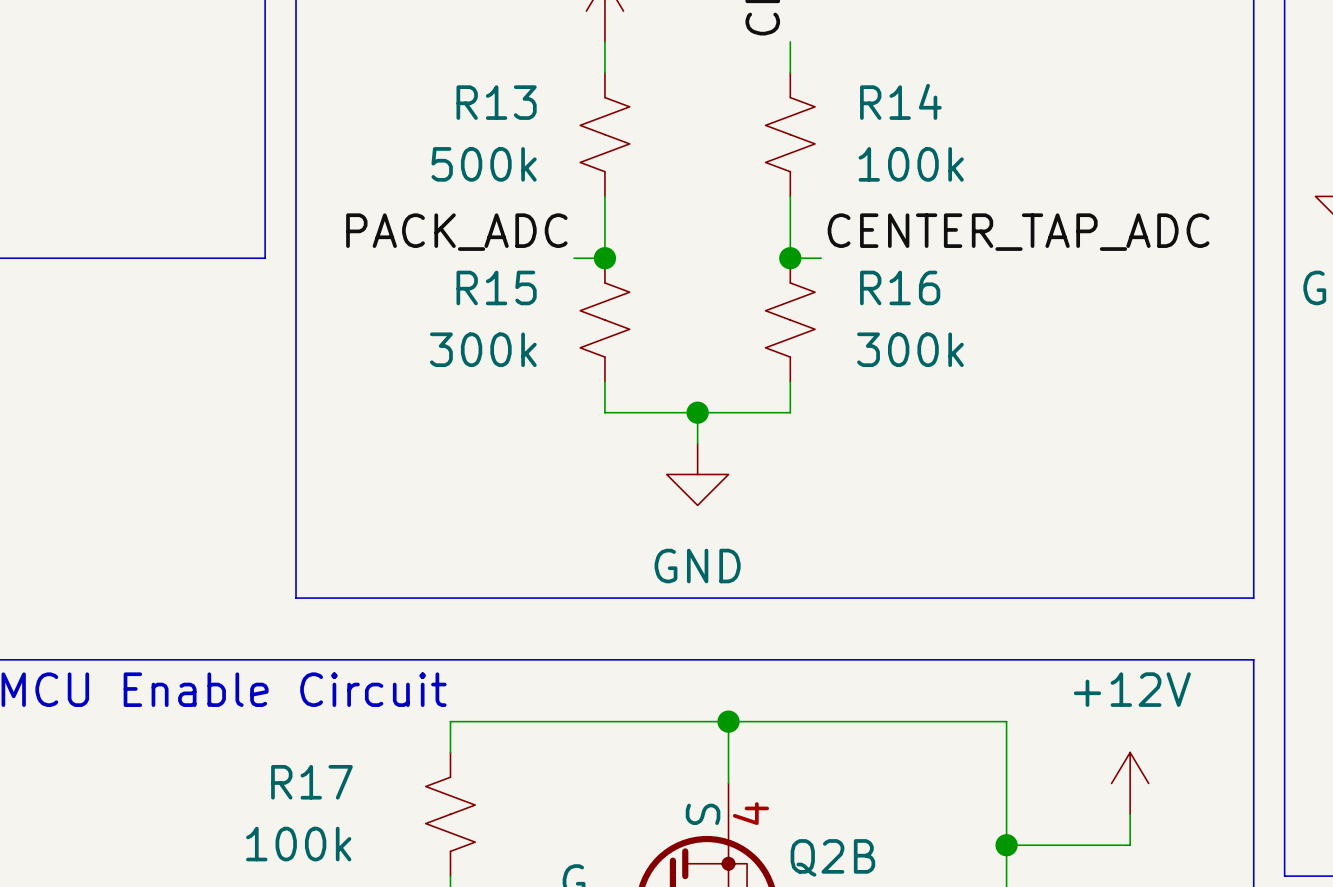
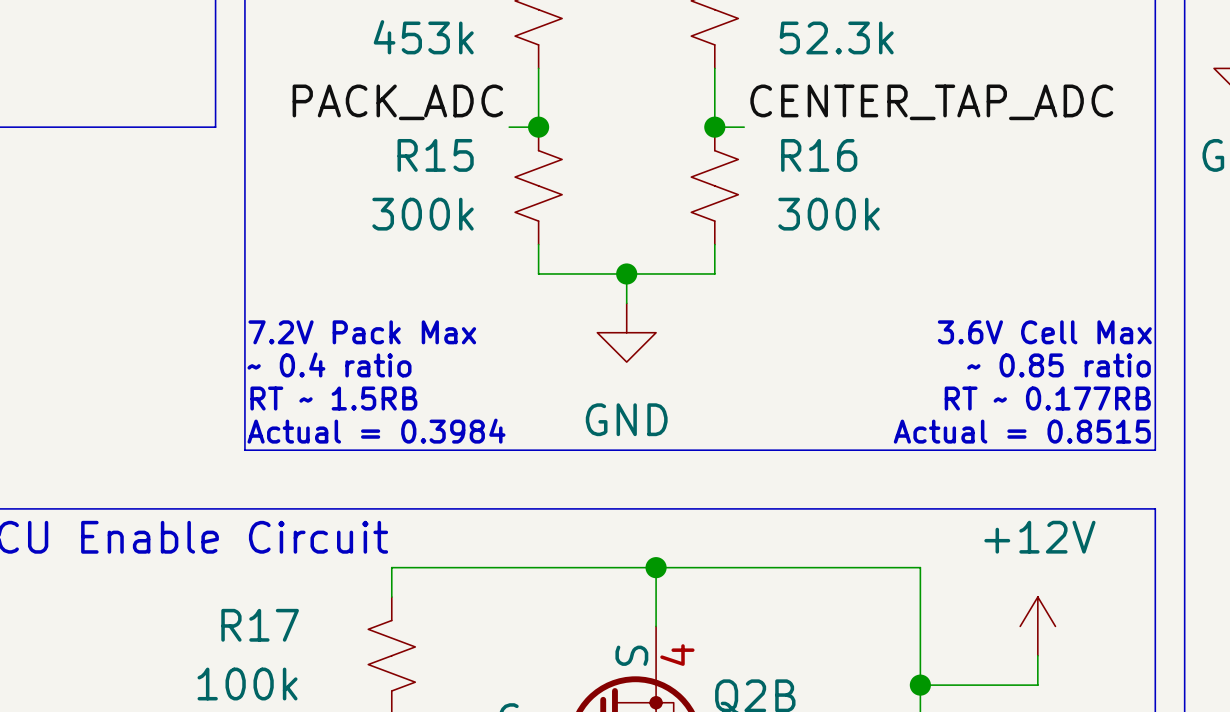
R13 value: 500k (484, 164) -> 453k (423, 37)
R14 value: 100k (911, 164) -> 52.3k (836, 37)
text: none -> 7.2V Pack Max (362, 332)
text: none -> 3.6V Cell Max (1044, 332)
text: none -> ~ 0.4 ratio (329, 364)
text: none -> ~ 0.85 ratio (1059, 365)
text: none -> RT ~ 1.5RB (333, 398)
text: none -> RT ~ 0.177RB (1047, 398)
text: none -> Actual = 0.3984 (376, 431)
text: none -> Actual = 0.8515 (1022, 431)

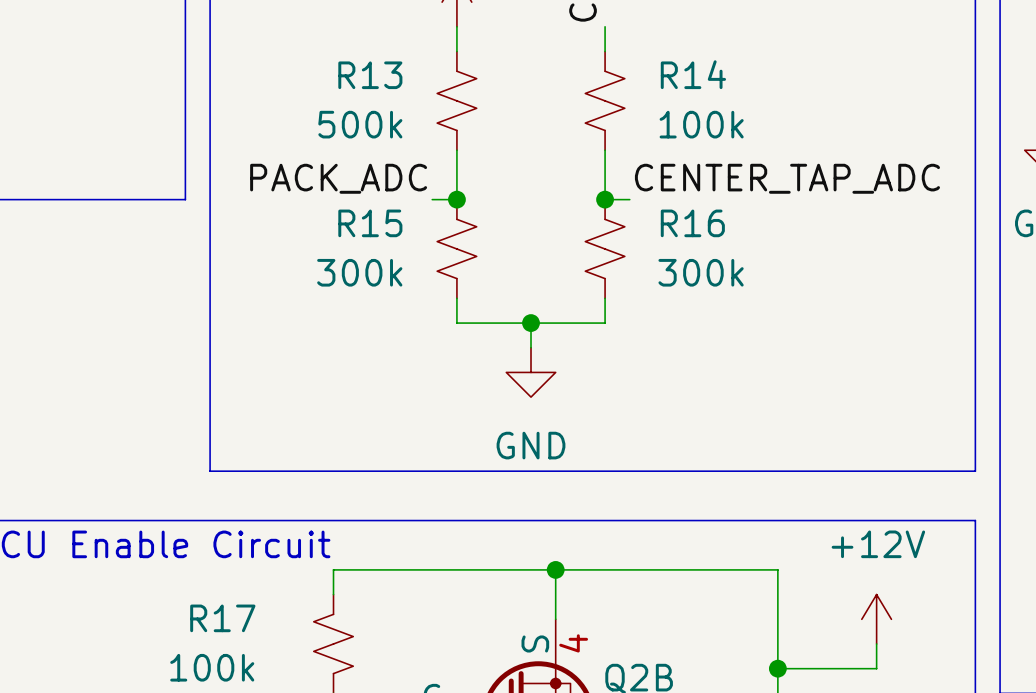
R13 value: 453k (423, 37) -> 500k (360, 124)
R14 value: 52.3k (836, 37) -> 100k (701, 124)
text: 7.2V Pack Max (362, 332) -> none
text: 3.6V Cell Max (1044, 332) -> none
text: ~ 0.4 ratio (329, 364) -> none
text: ~ 0.85 ratio (1059, 365) -> none
text: RT ~ 1.5RB (333, 398) -> none
text: RT ~ 0.177RB (1047, 398) -> none
text: Actual = 0.3984 (376, 431) -> none
text: Actual = 0.8515 (1022, 431) -> none

